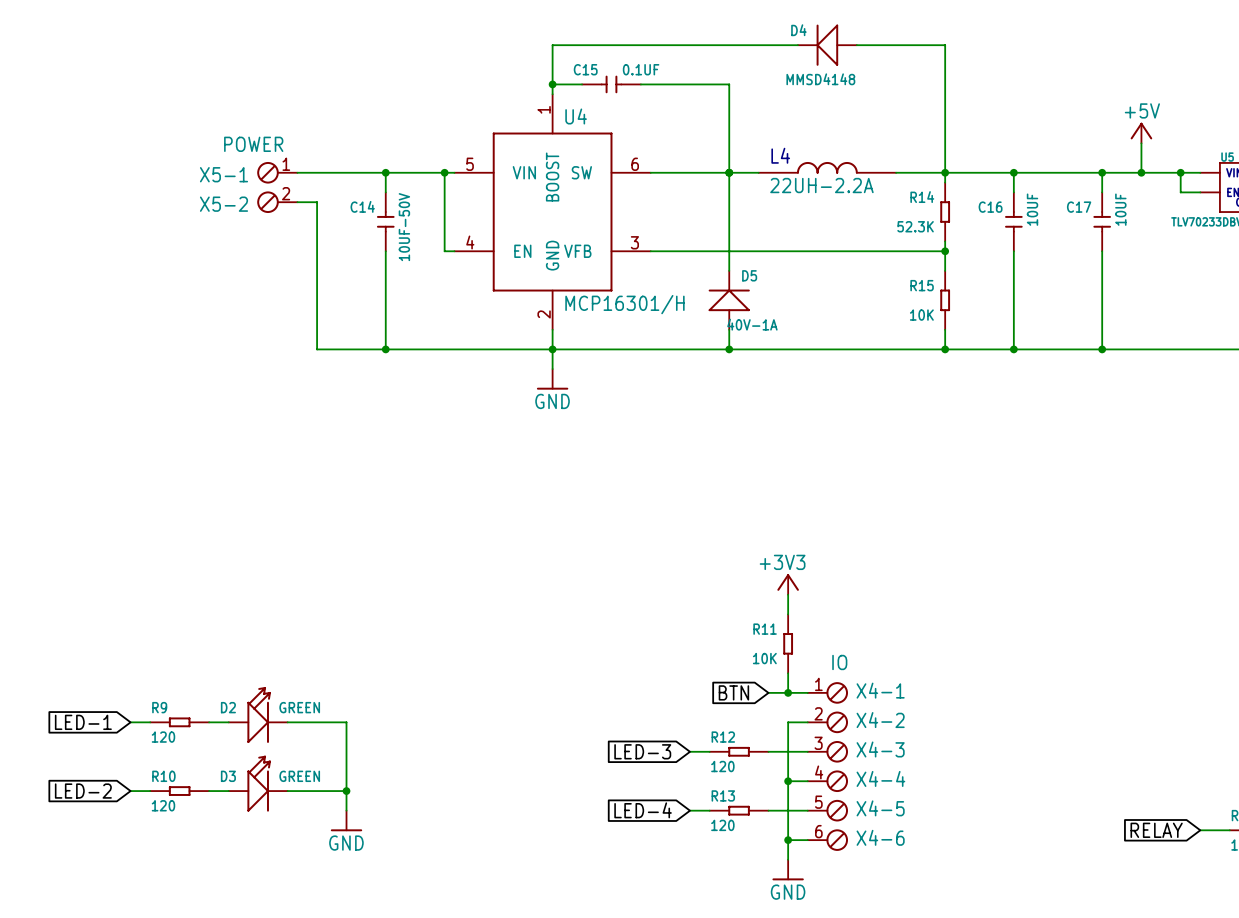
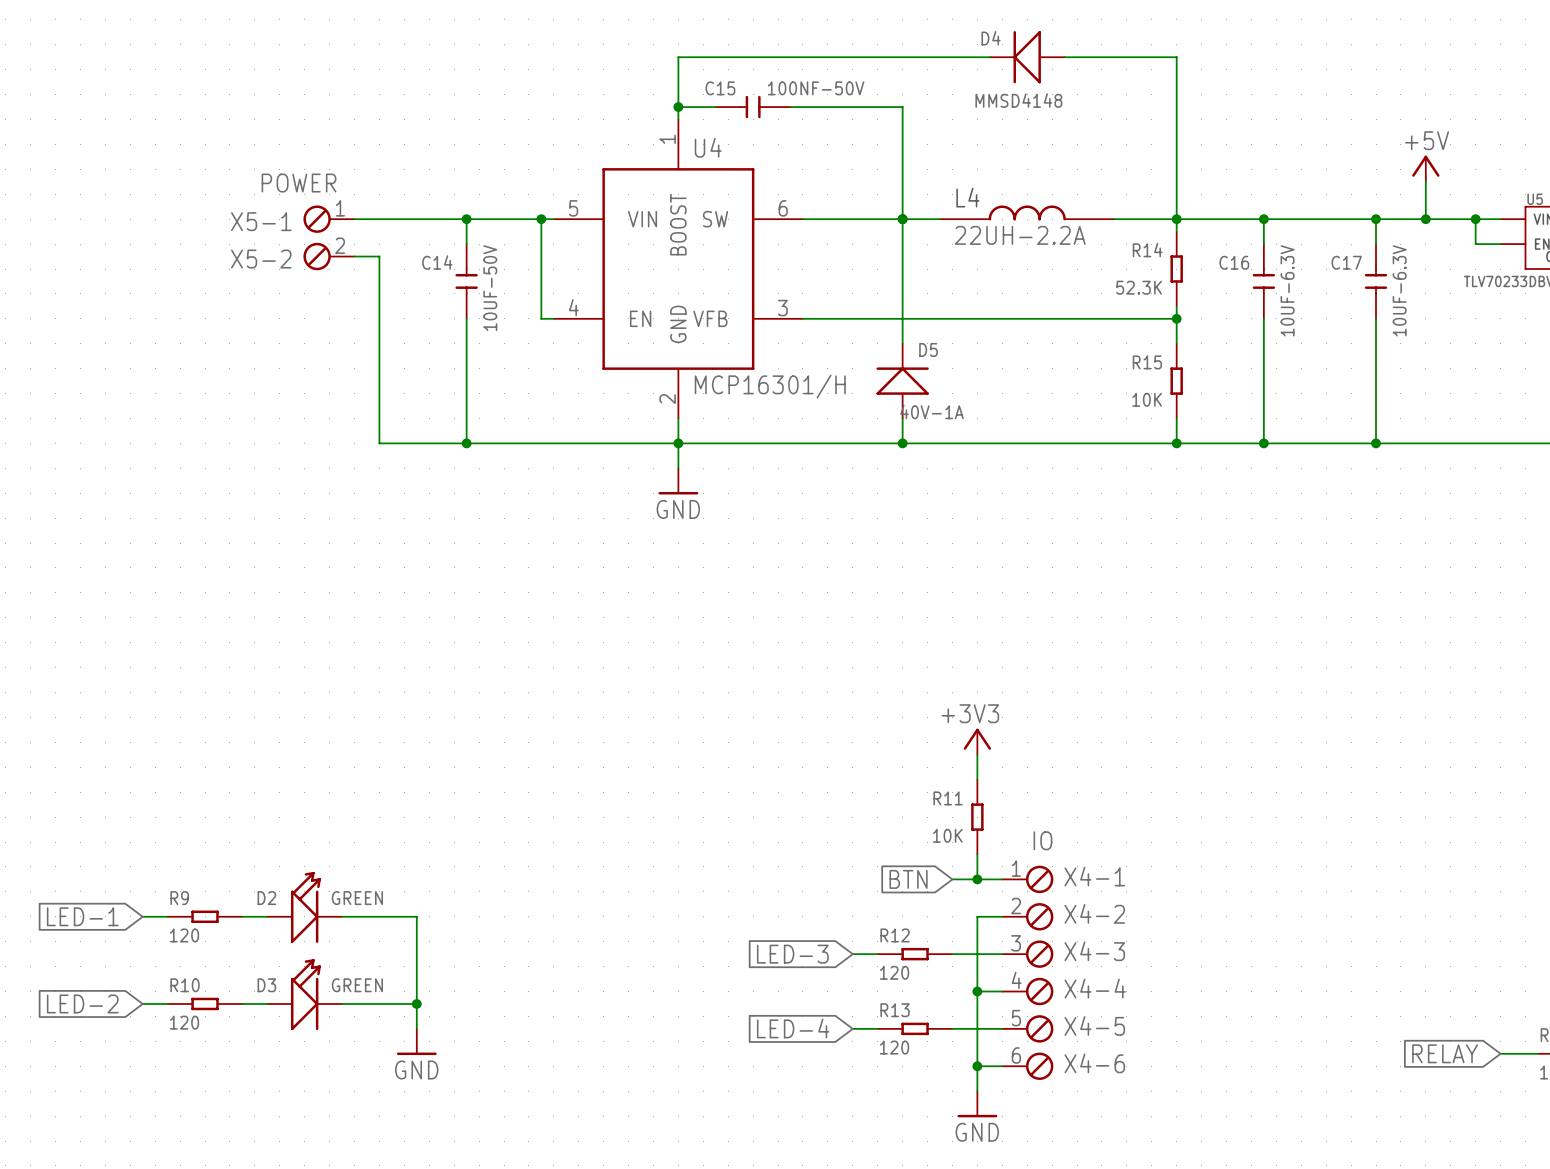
C15 value: 0.1UF (641, 69) -> 100NF-50V (816, 88)
C16 value: 10UF (1032, 209) -> 10UF-6.3V (1287, 290)
C17 value: 10UF (1120, 209) -> 10UF-6.3V (1399, 290)

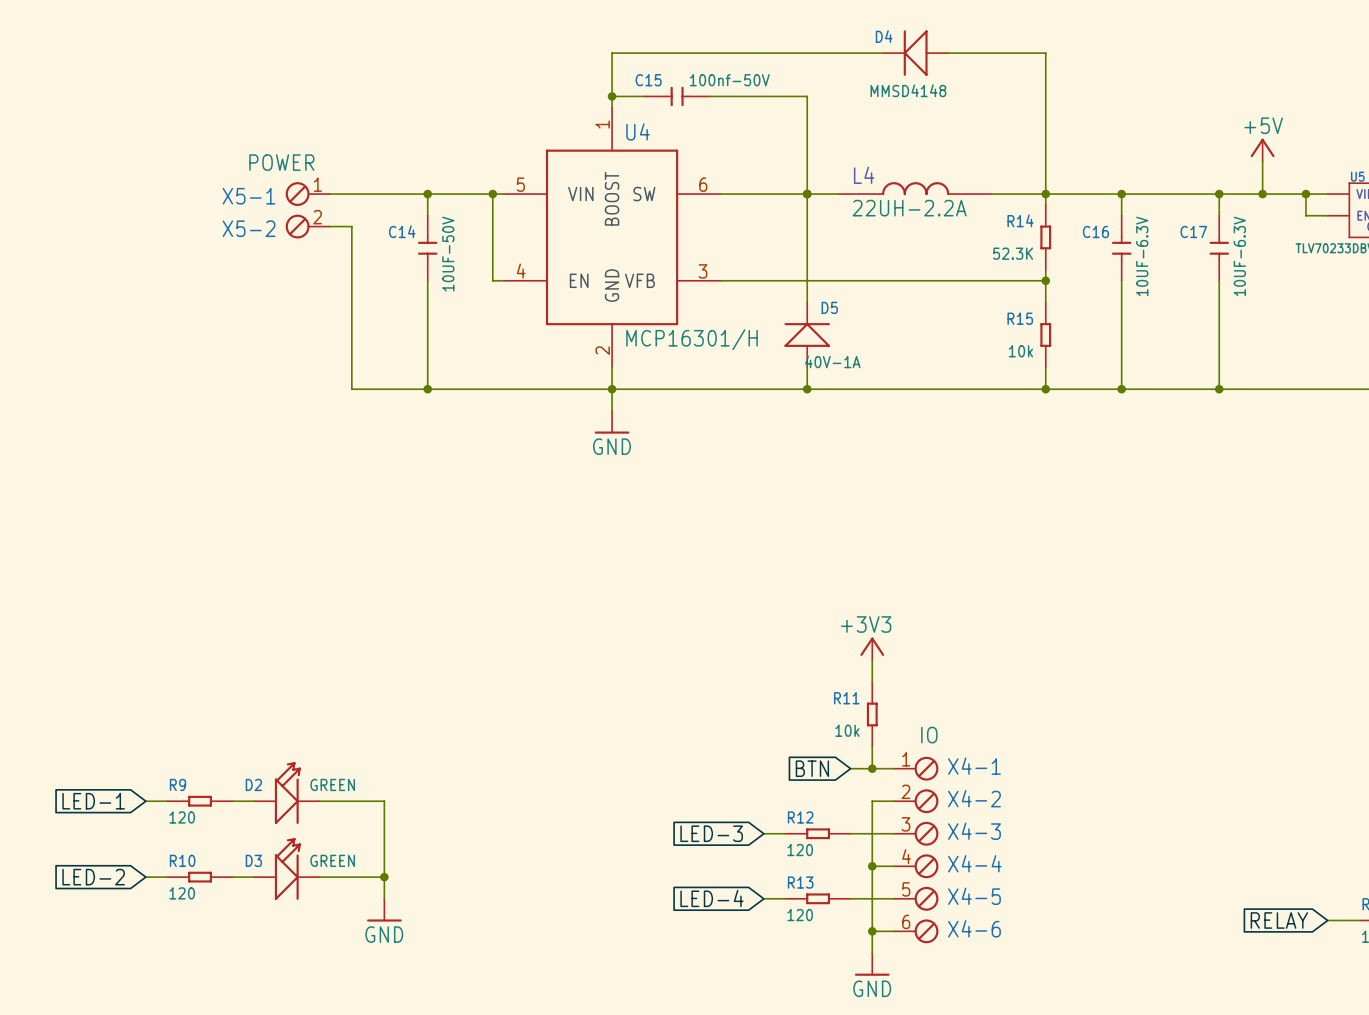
C15 value: 100NF-50V (816, 88) -> 100nf-50V (729, 80)
R15 value: 10K (1147, 399) -> 10k (1020, 351)
R11 value: 10K (947, 835) -> 10k (847, 730)

